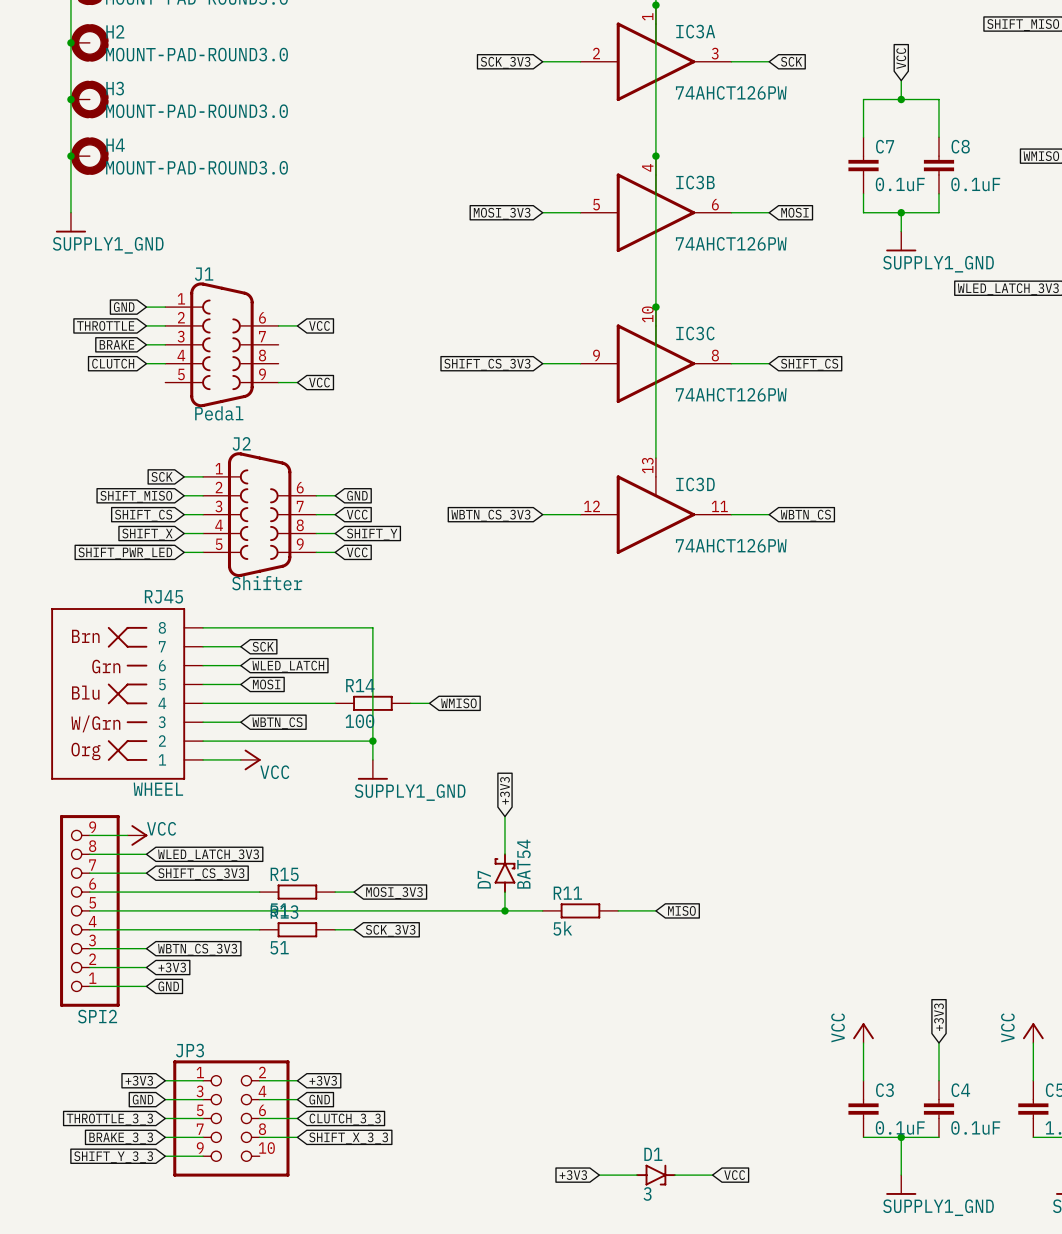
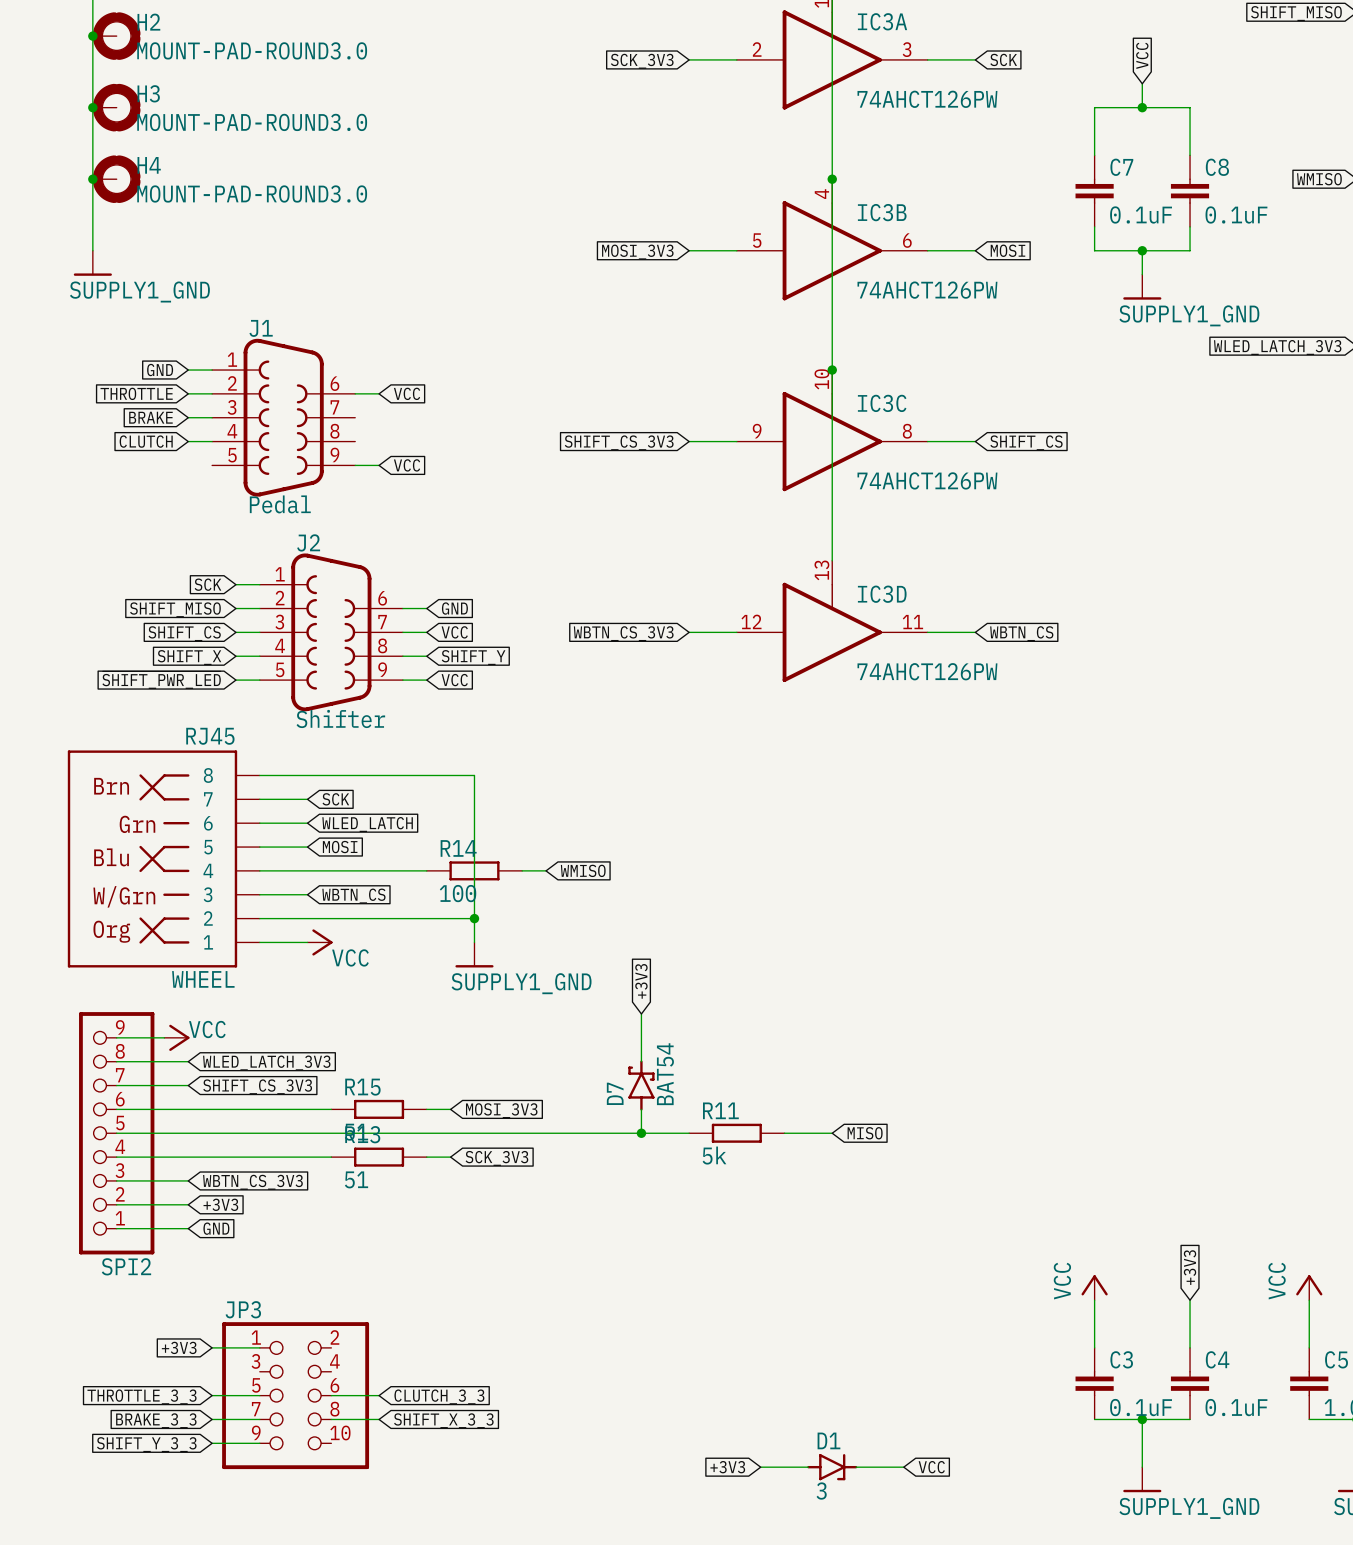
wire: (259, 1080) (297, 1080) -> none
global label: +3V3 (323, 1080) -> none
global label: GND (143, 1099) -> none
wire: (165, 1099) (203, 1099) -> none
wire: (259, 1099) (297, 1099) -> none
global label: GND (319, 1099) -> none

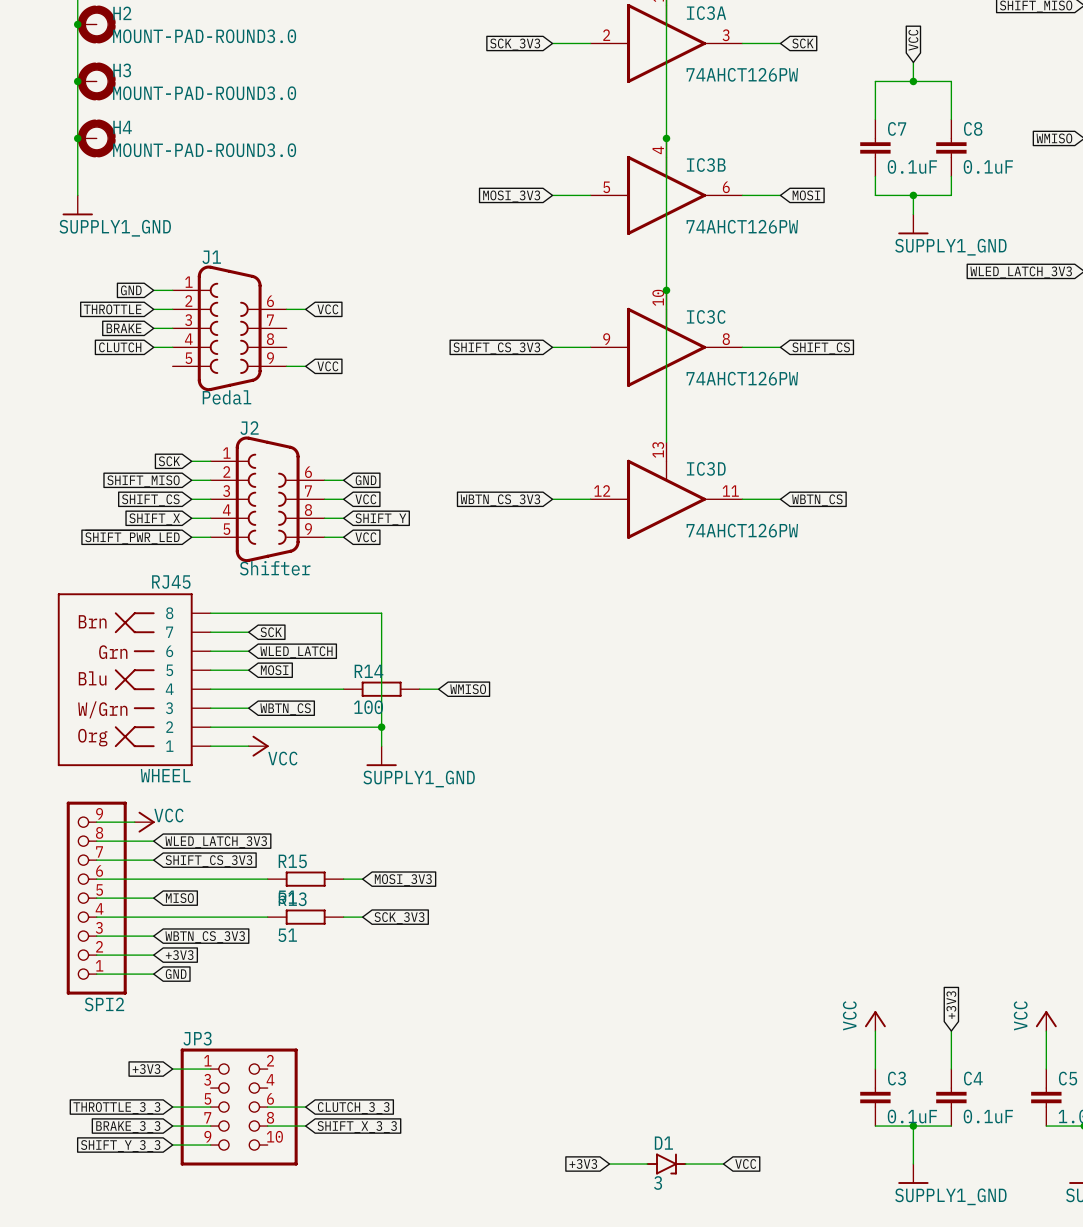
global label: +3V3 (641, 981) -> none
wire: (641, 1014) (641, 1061) -> none
D7: BAT54 (641, 1085) -> none
wire: (641, 1109) (641, 1133) -> none
wire: (188, 1133) (689, 1133) -> none
global label: none -> MISO (179, 898)
junction: (641, 1133) -> none
R11: 5k (736, 1133) -> none
wire: (784, 1133) (832, 1133) -> none
global label: MISO (865, 1133) -> none

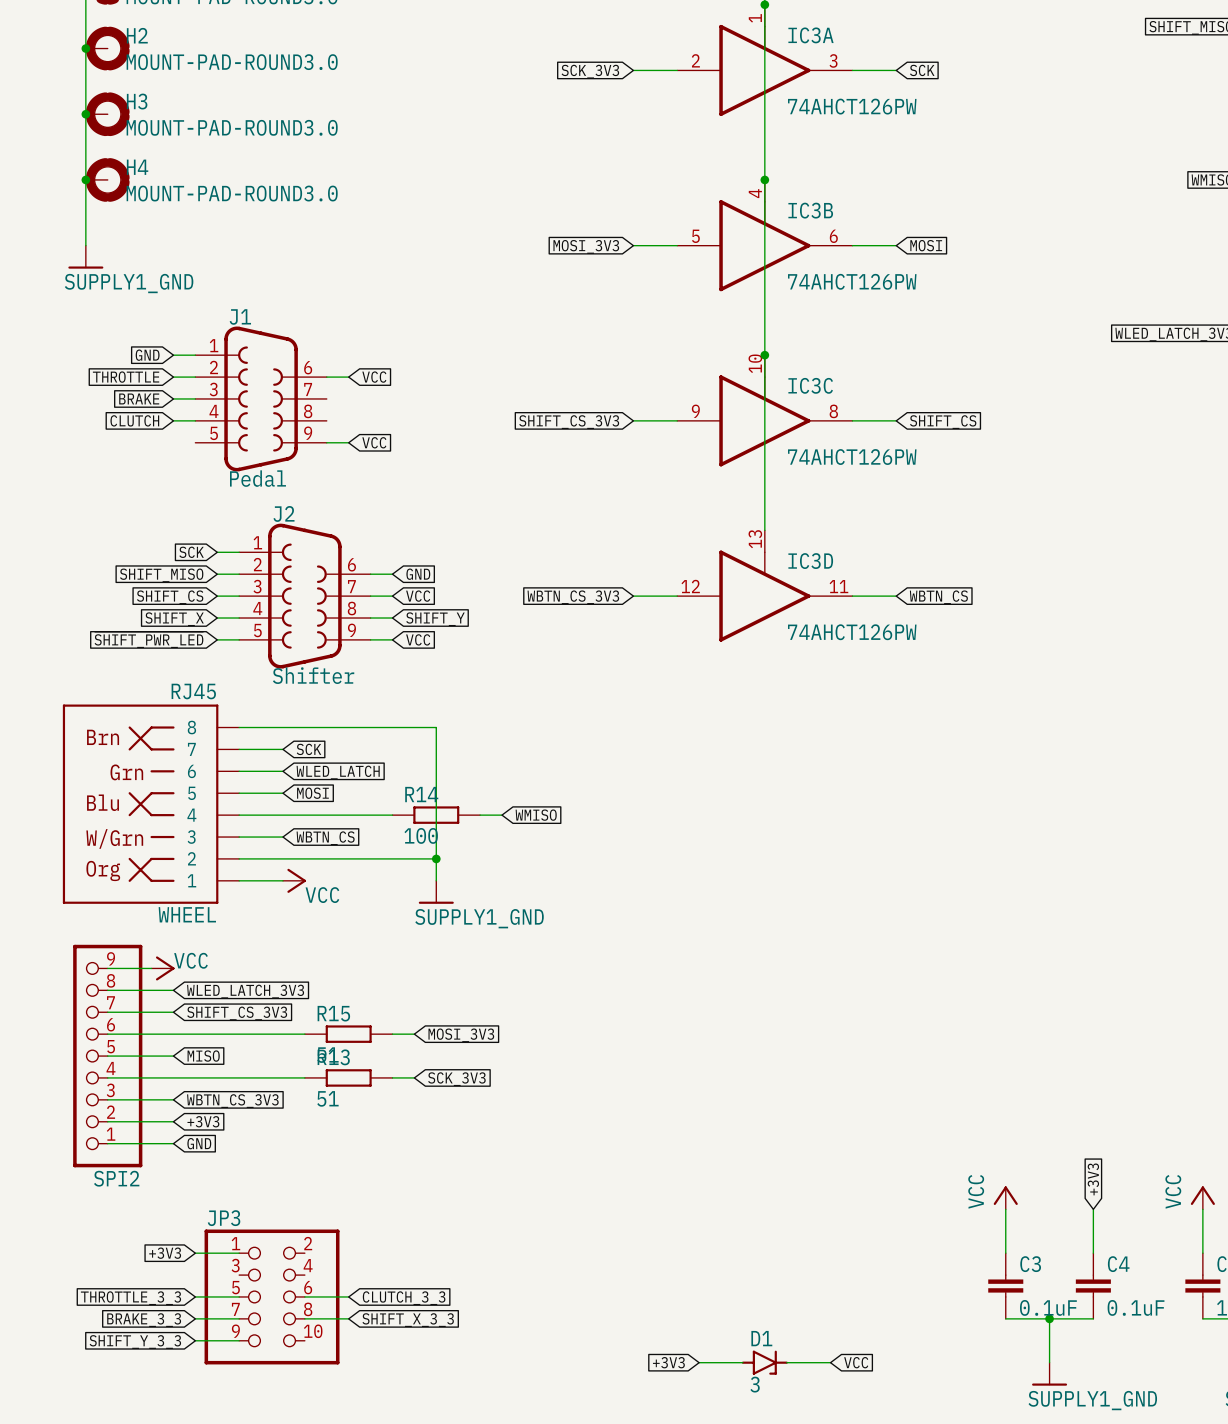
global label: VCC (913, 40) -> none
wire: (913, 62) (913, 81) -> none
junction: (913, 81) -> none
wire: (875, 119) (875, 81) (951, 81) (951, 119) -> none
C7: 0.1uF (875, 147) -> none
C8: 0.1uF (951, 147) -> none
wire: (875, 176) (875, 195) (951, 195) (951, 176) -> none
wire: (913, 195) (913, 214) -> none
junction: (913, 195) -> none
power symbol: SUPPLY1_GND (913, 224) -> none

